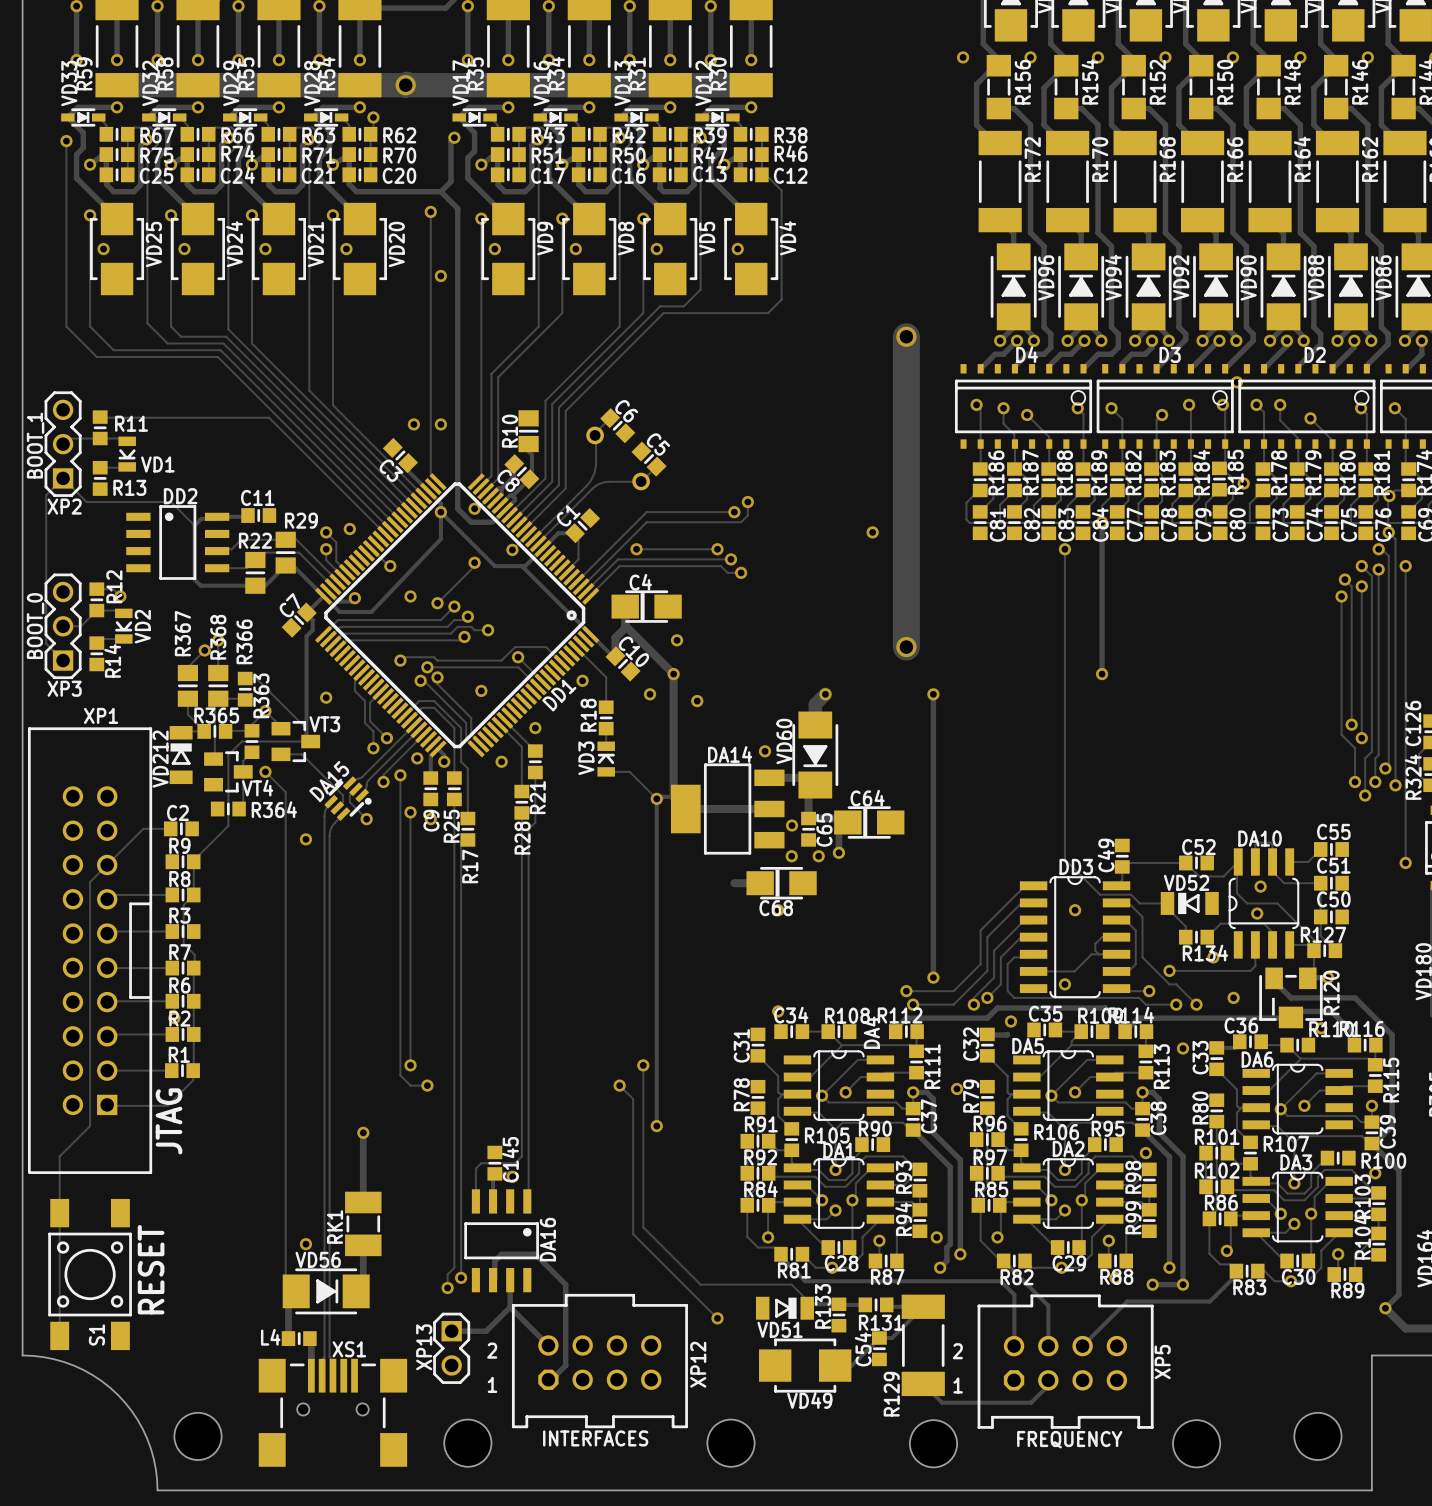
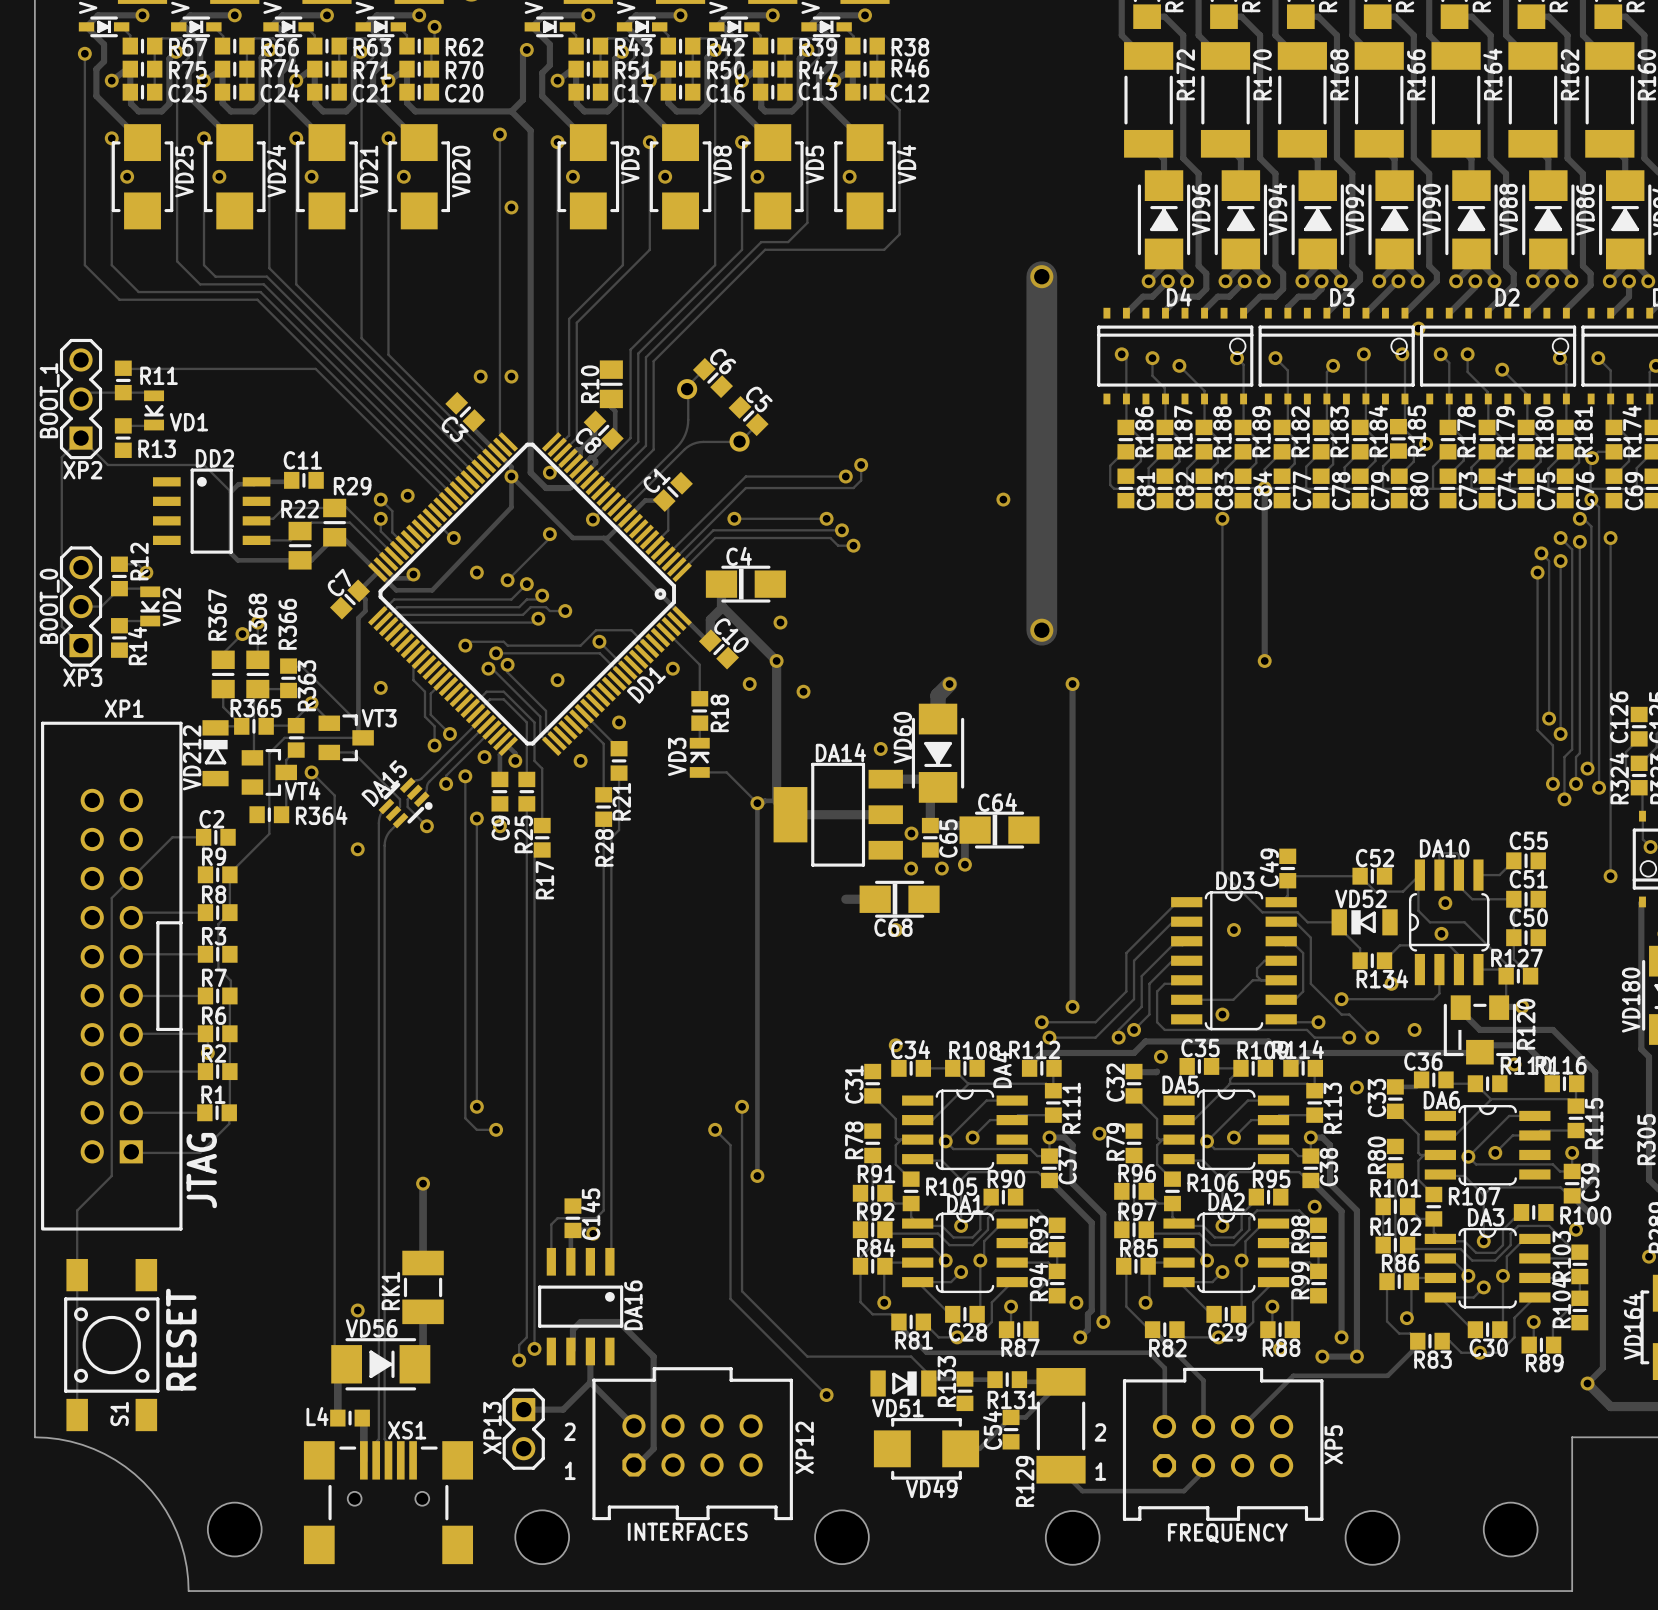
R18 name position: R18 (588, 715) -> R18 (719, 713)

